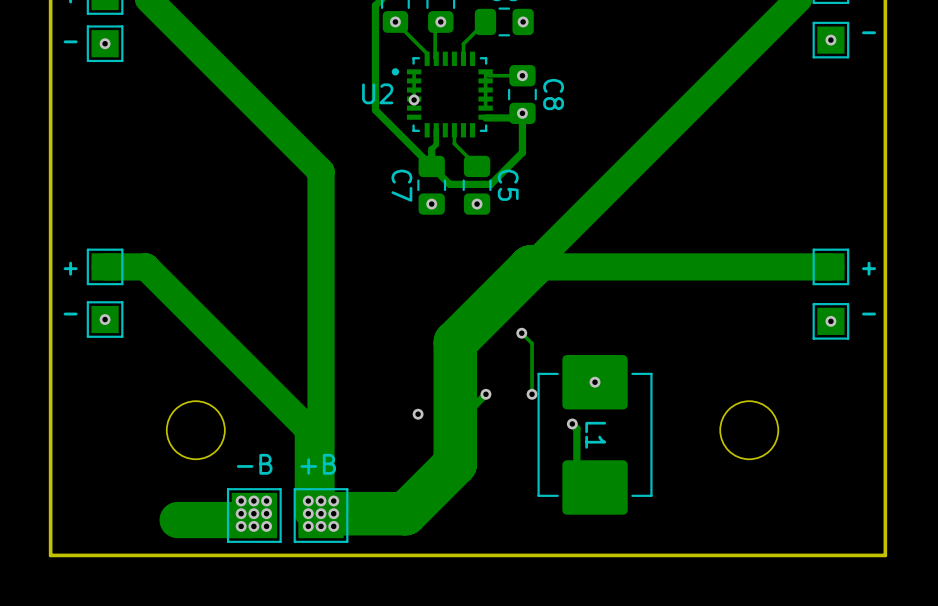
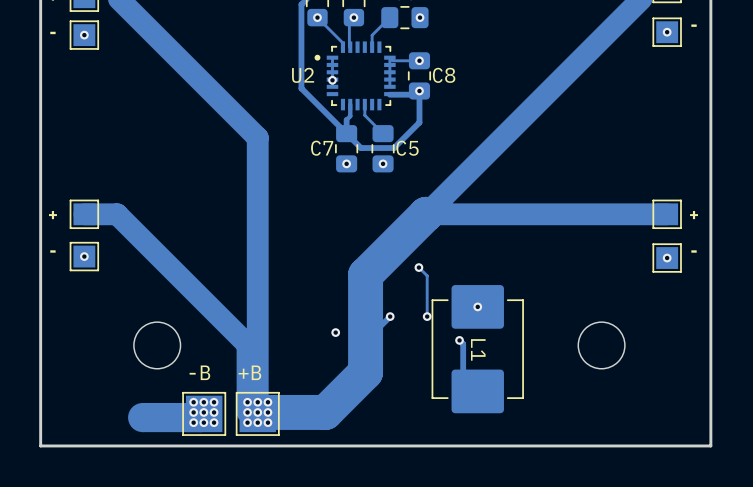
C8 name rotation: 0° (553, 94) -> 90° counterclockwise (444, 75)
C7 name rotation: 0° (401, 185) -> 90° counterclockwise (322, 148)
C5 name rotation: 0° (508, 185) -> 90° counterclockwise (407, 148)

